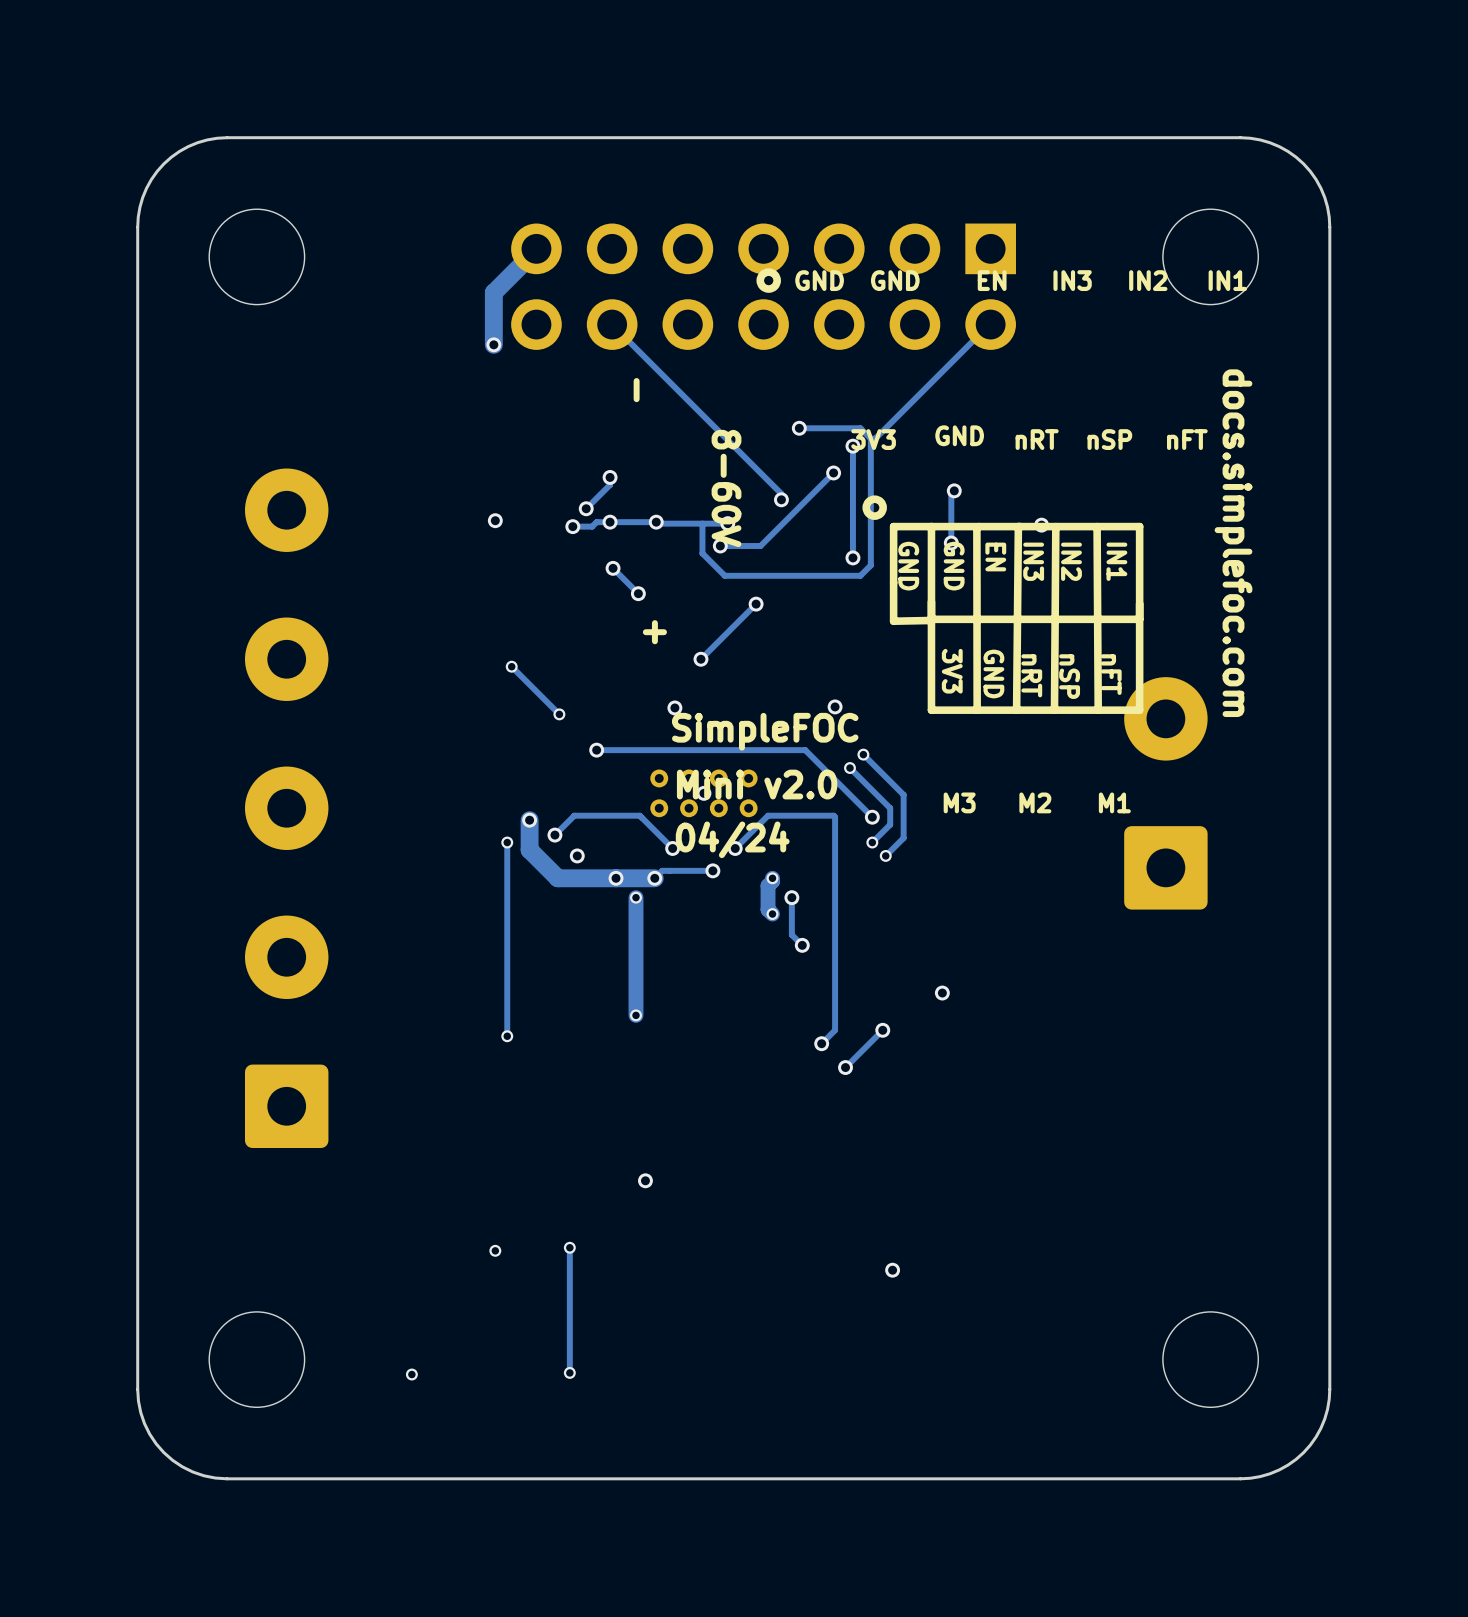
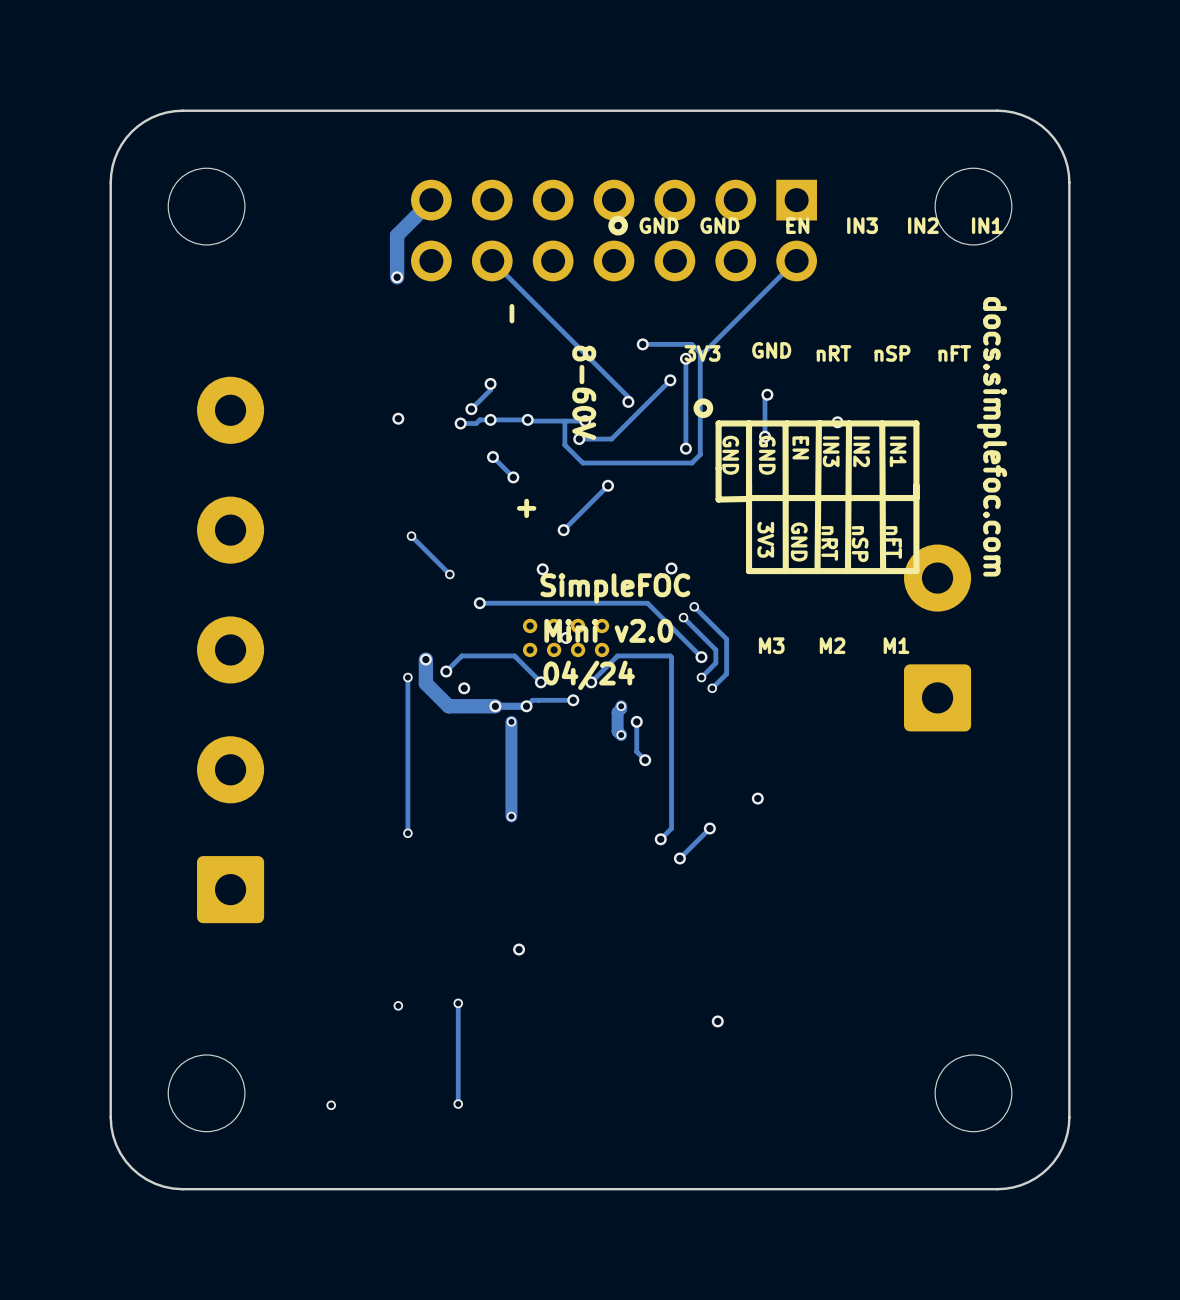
track width: thick (654, 878) (616, 878) -> thin (526, 706) (495, 706)

